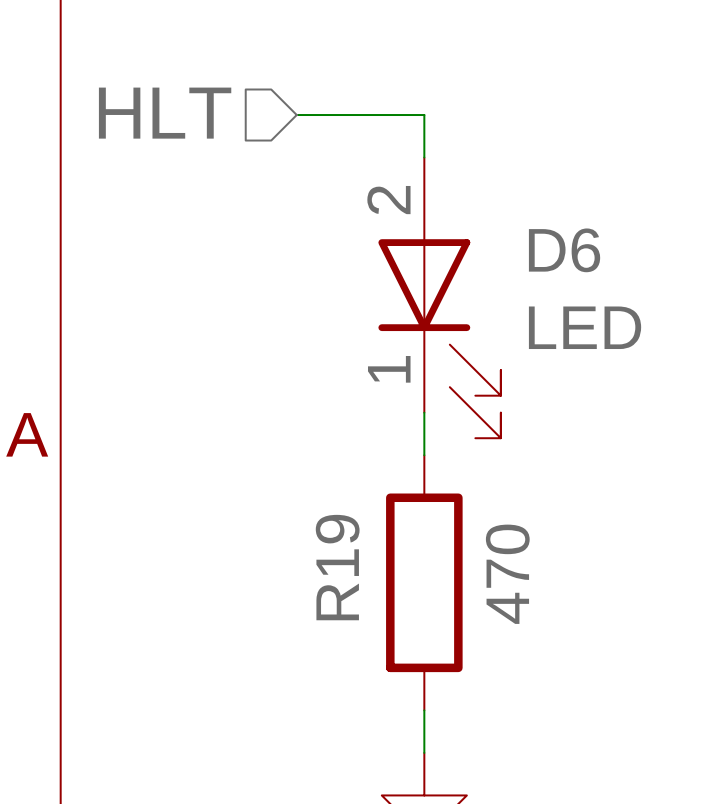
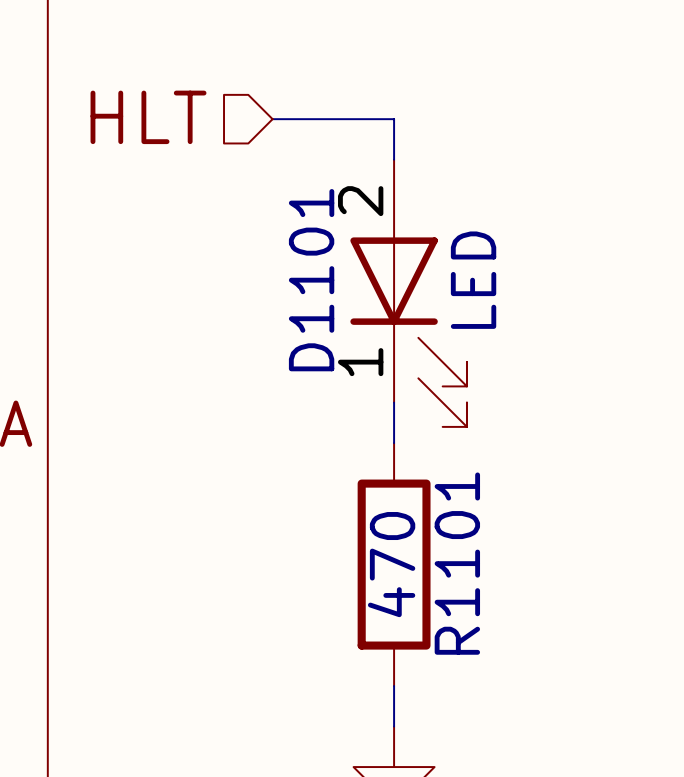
D6 name: D6 (564, 250) -> D1101 (311, 280)
D6 value rotation: 0° (585, 327) -> 90° counterclockwise (473, 280)
R19 name: R19 (337, 567) -> R1101 (457, 563)
R19 value position: 470 (507, 574) -> 470 (391, 564)

